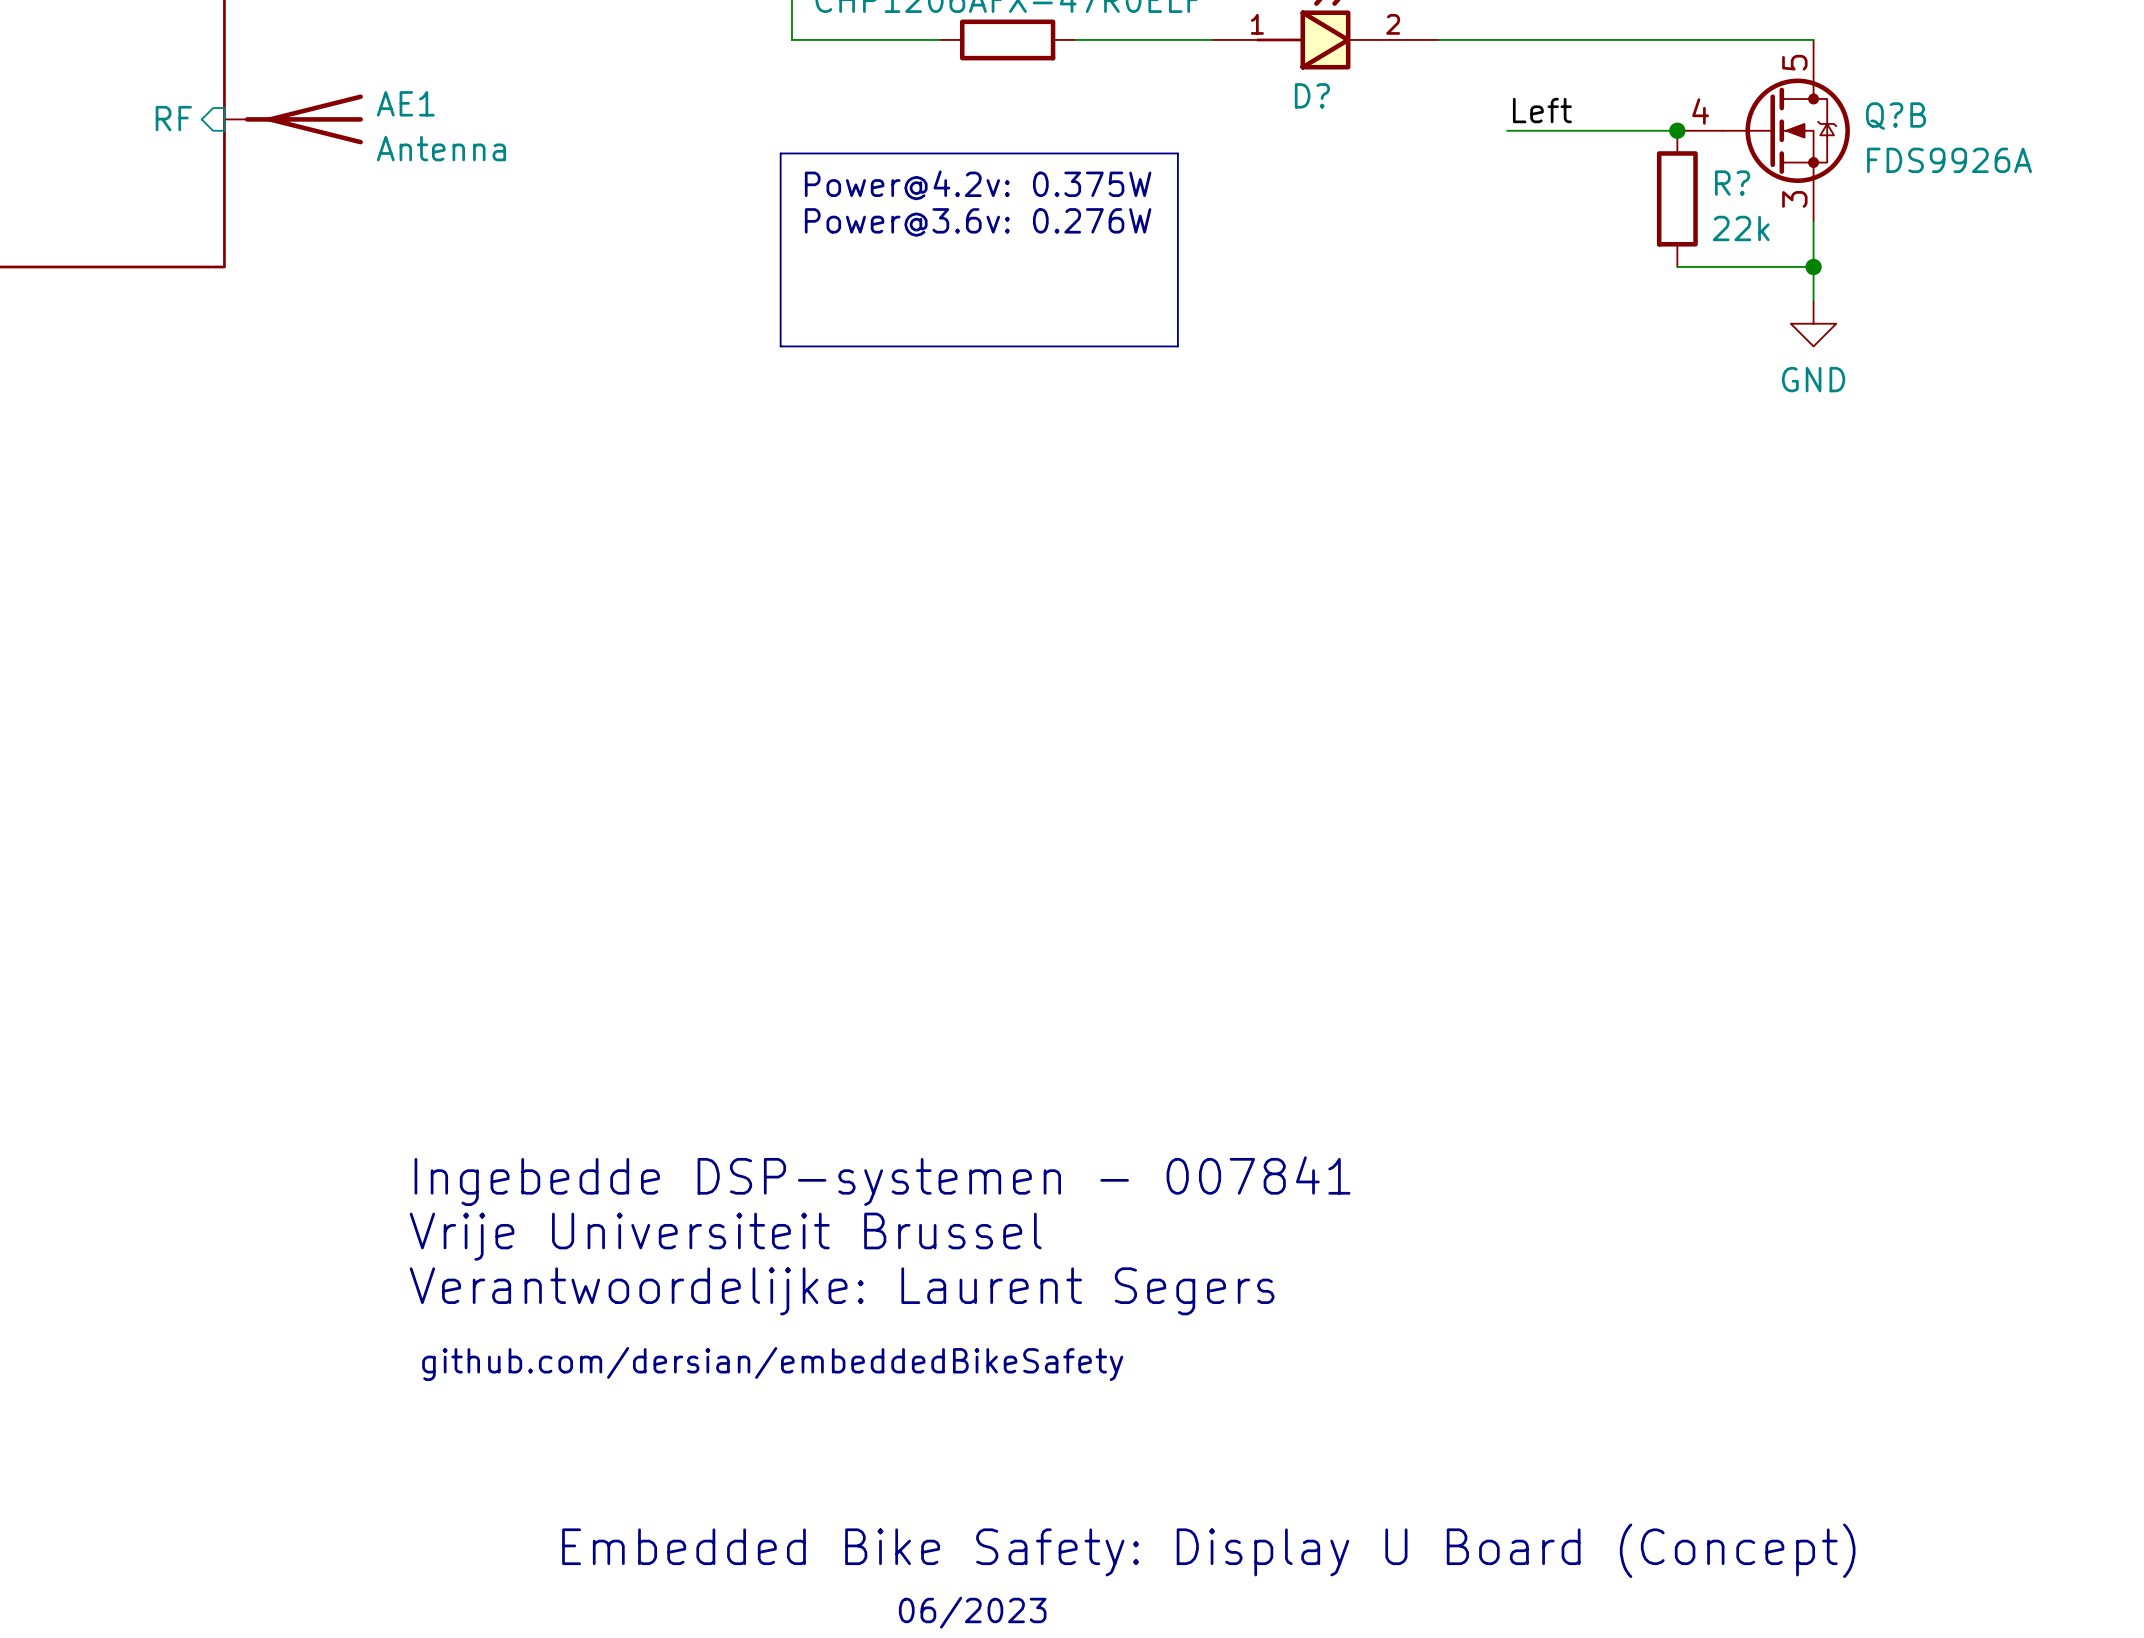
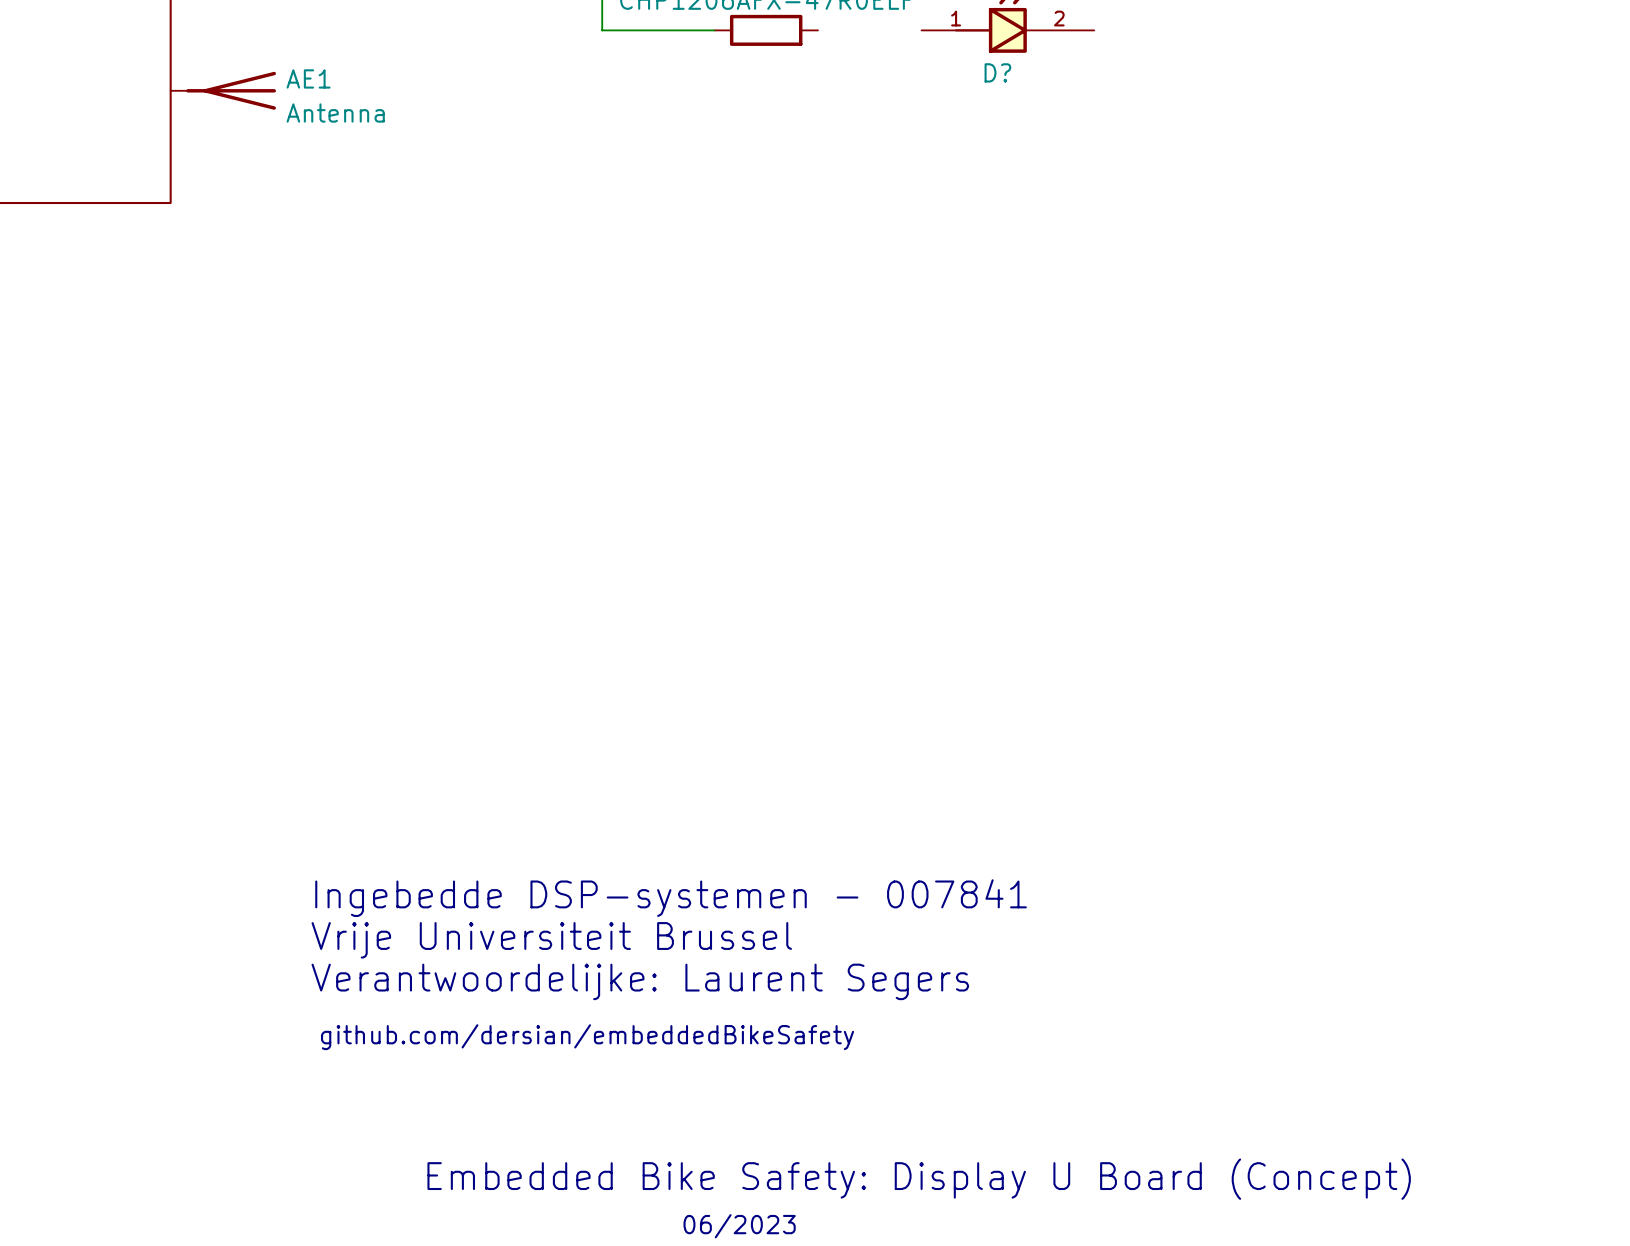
wire: (1075, 39) (1211, 39) -> none
wire: (1438, 39) (1813, 39) -> none
label: Left (1542, 110) -> none
sheet pin: RF (173, 118) -> none
wire: (1507, 130) (1677, 130) -> none
junction: (1677, 130) -> none
Q?B: FDS9926A (1763, 130) -> none
line: (780, 153) (1177, 153) (1177, 346) (780, 346) (780, 153) -> none
text: Power@4.2v: 0.375W (978, 185) -> none
R?: 22k (1677, 198) -> none
wire: (1813, 221) (1813, 301) -> none
text: Power@3.6v: 0.276W (978, 222) -> none
wire: (1677, 266) (1813, 266) -> none
junction: (1813, 266) -> none
power symbol: GND (1813, 323) -> none

